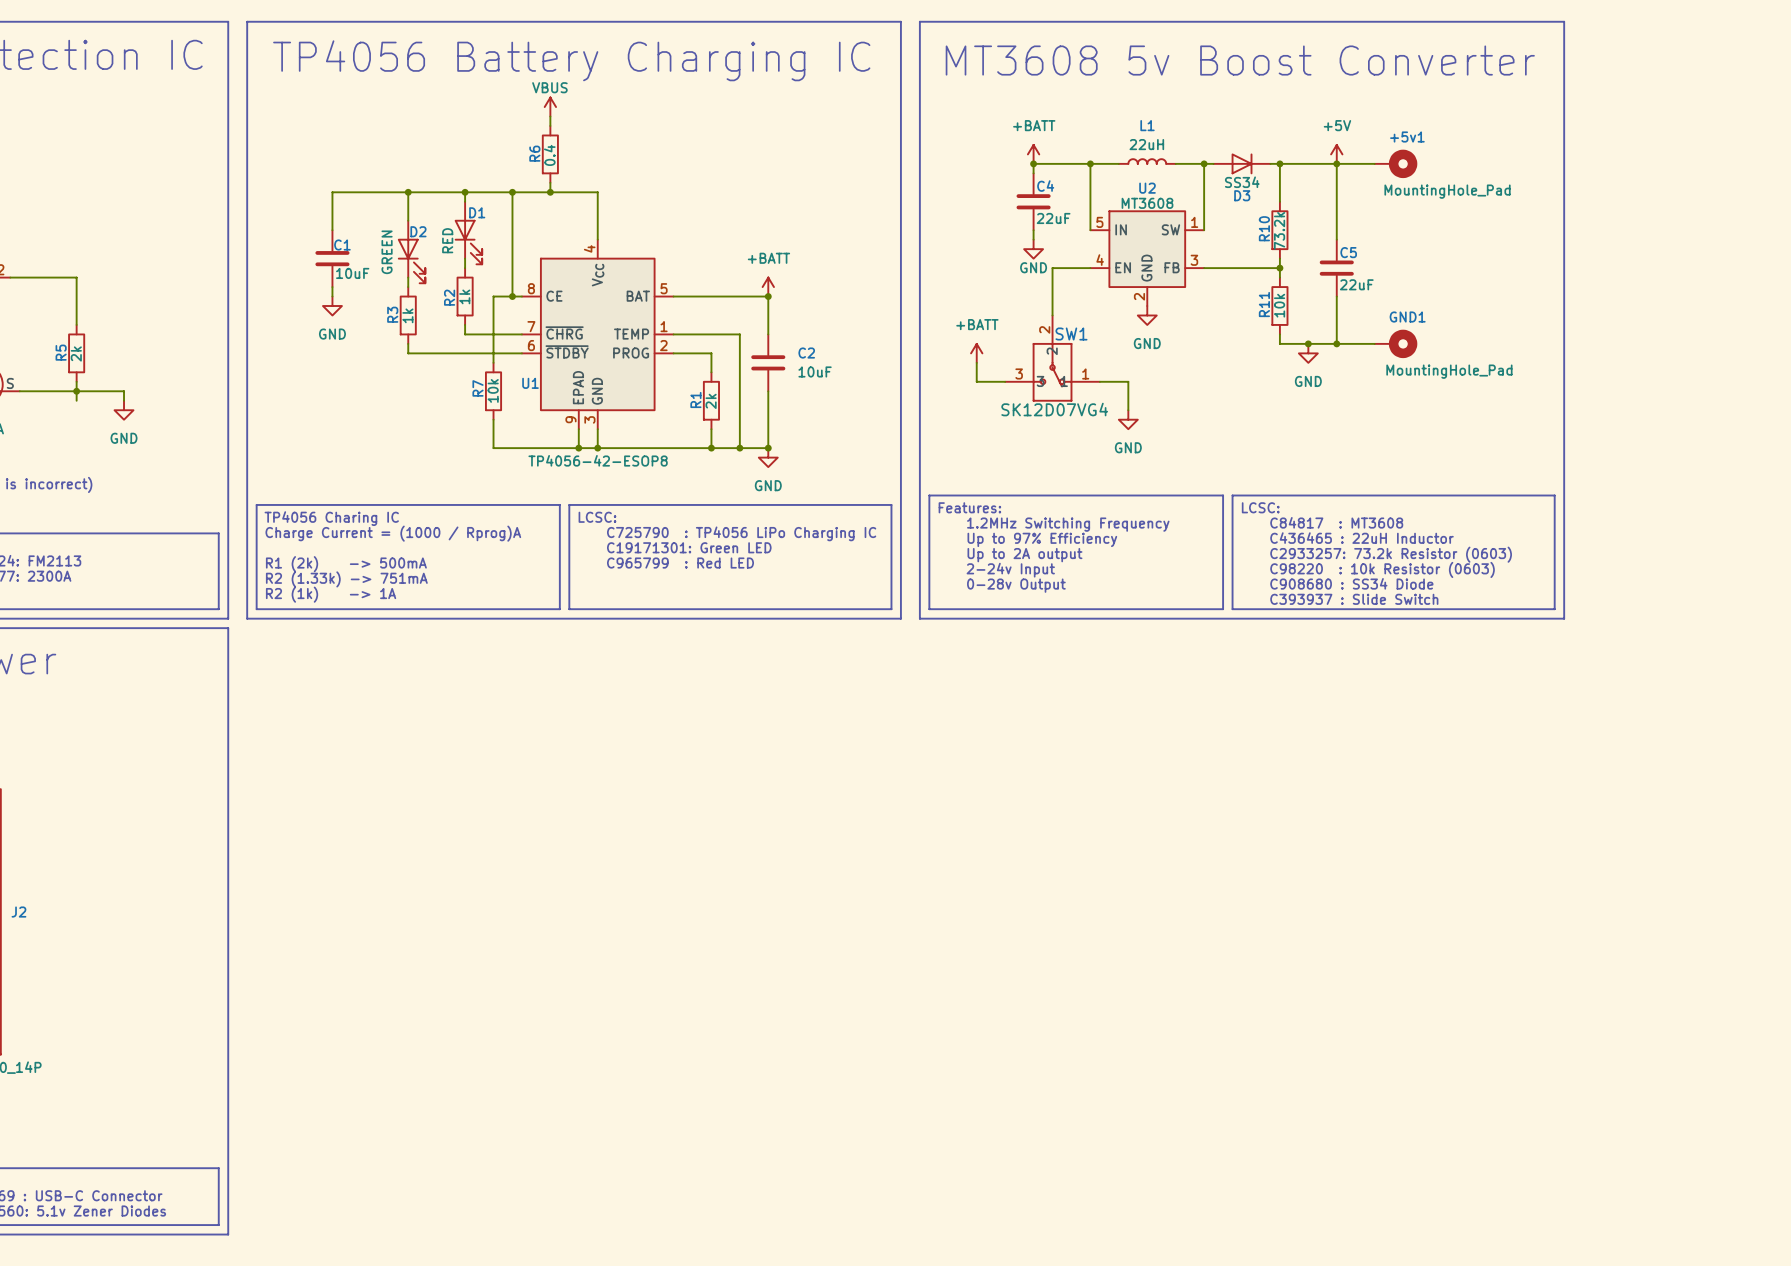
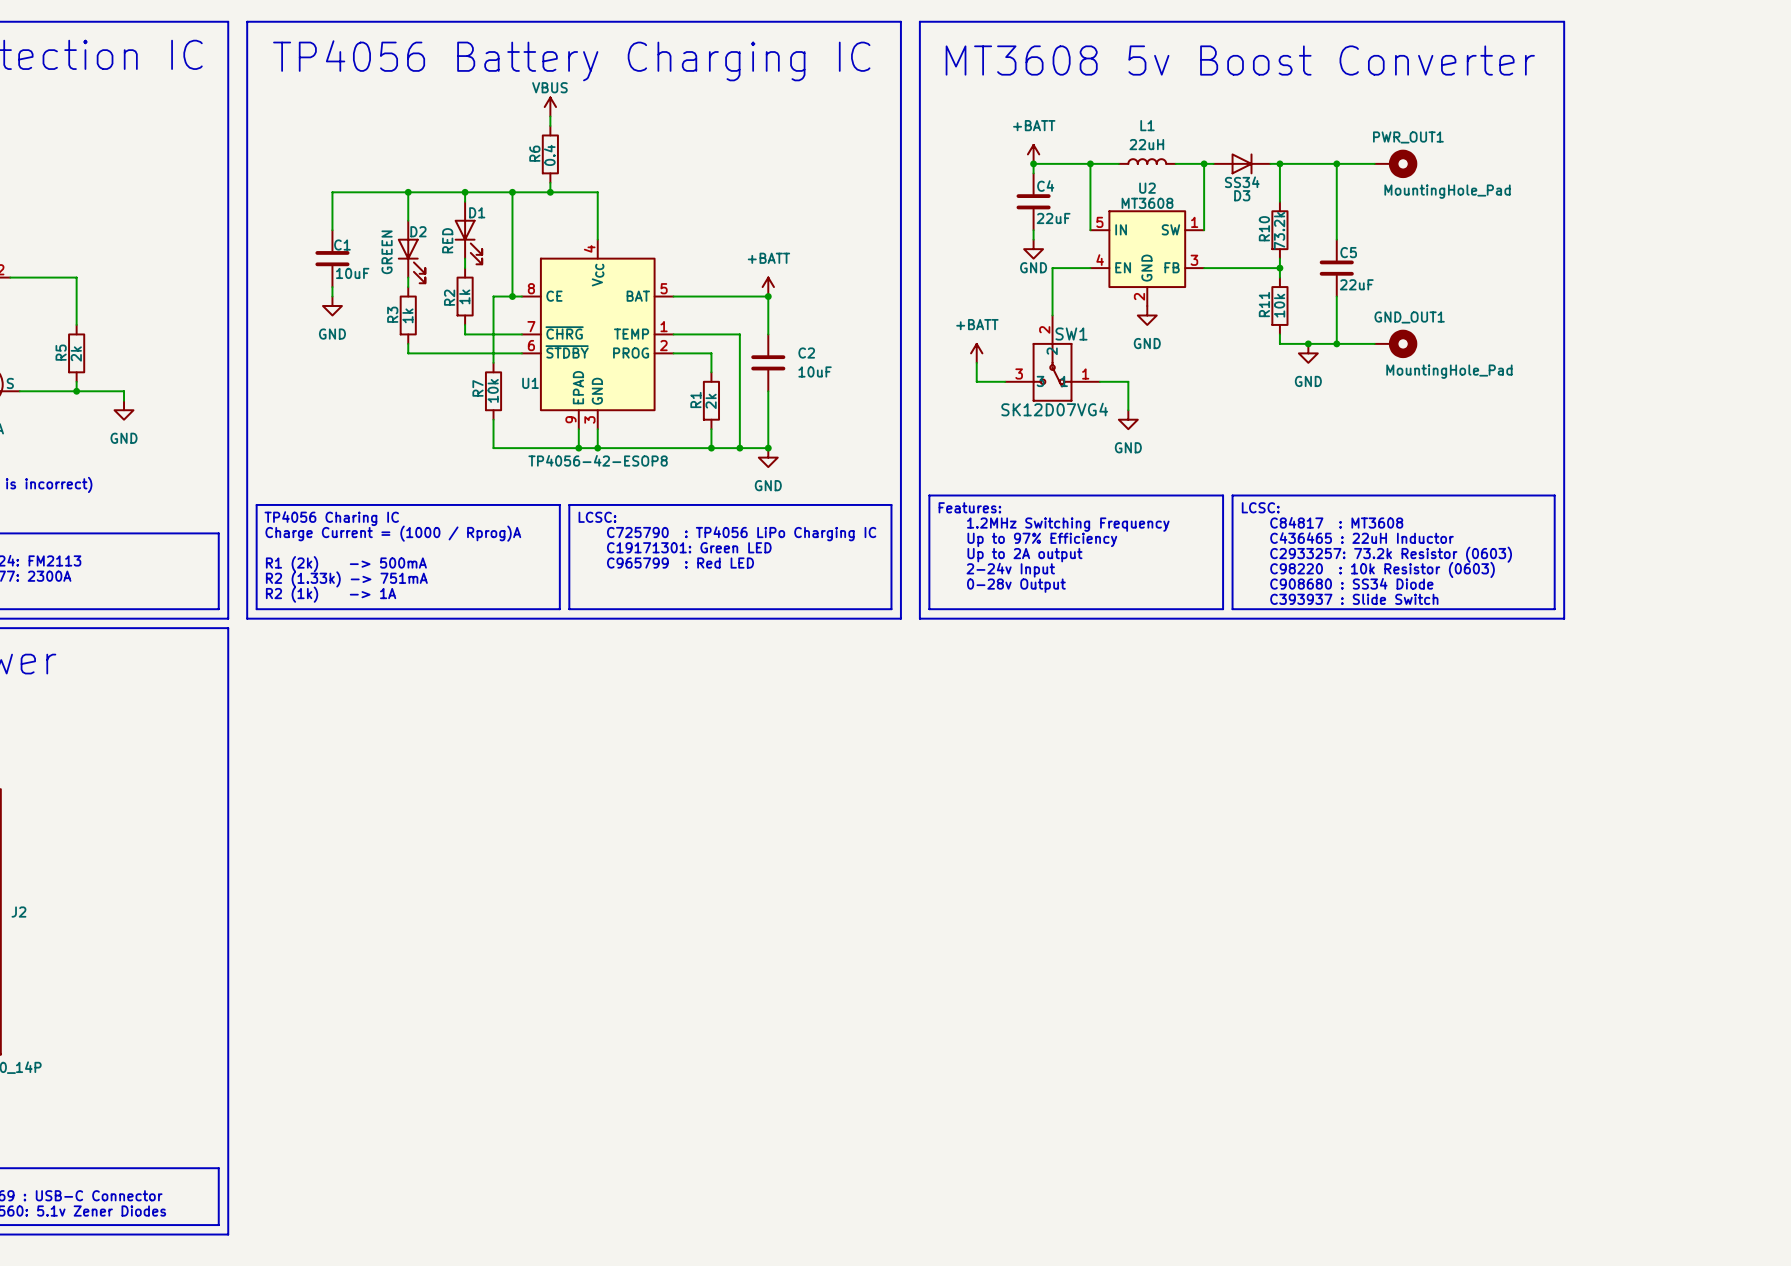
+5v1 name: +5v1 (1407, 137) -> PWR_OUT1 (1408, 137)
power symbol: +5V (1336, 154) -> none
GND1 name: GND1 (1407, 317) -> GND_OUT1 (1409, 317)
wire: (76, 391) (76, 400) -> none

